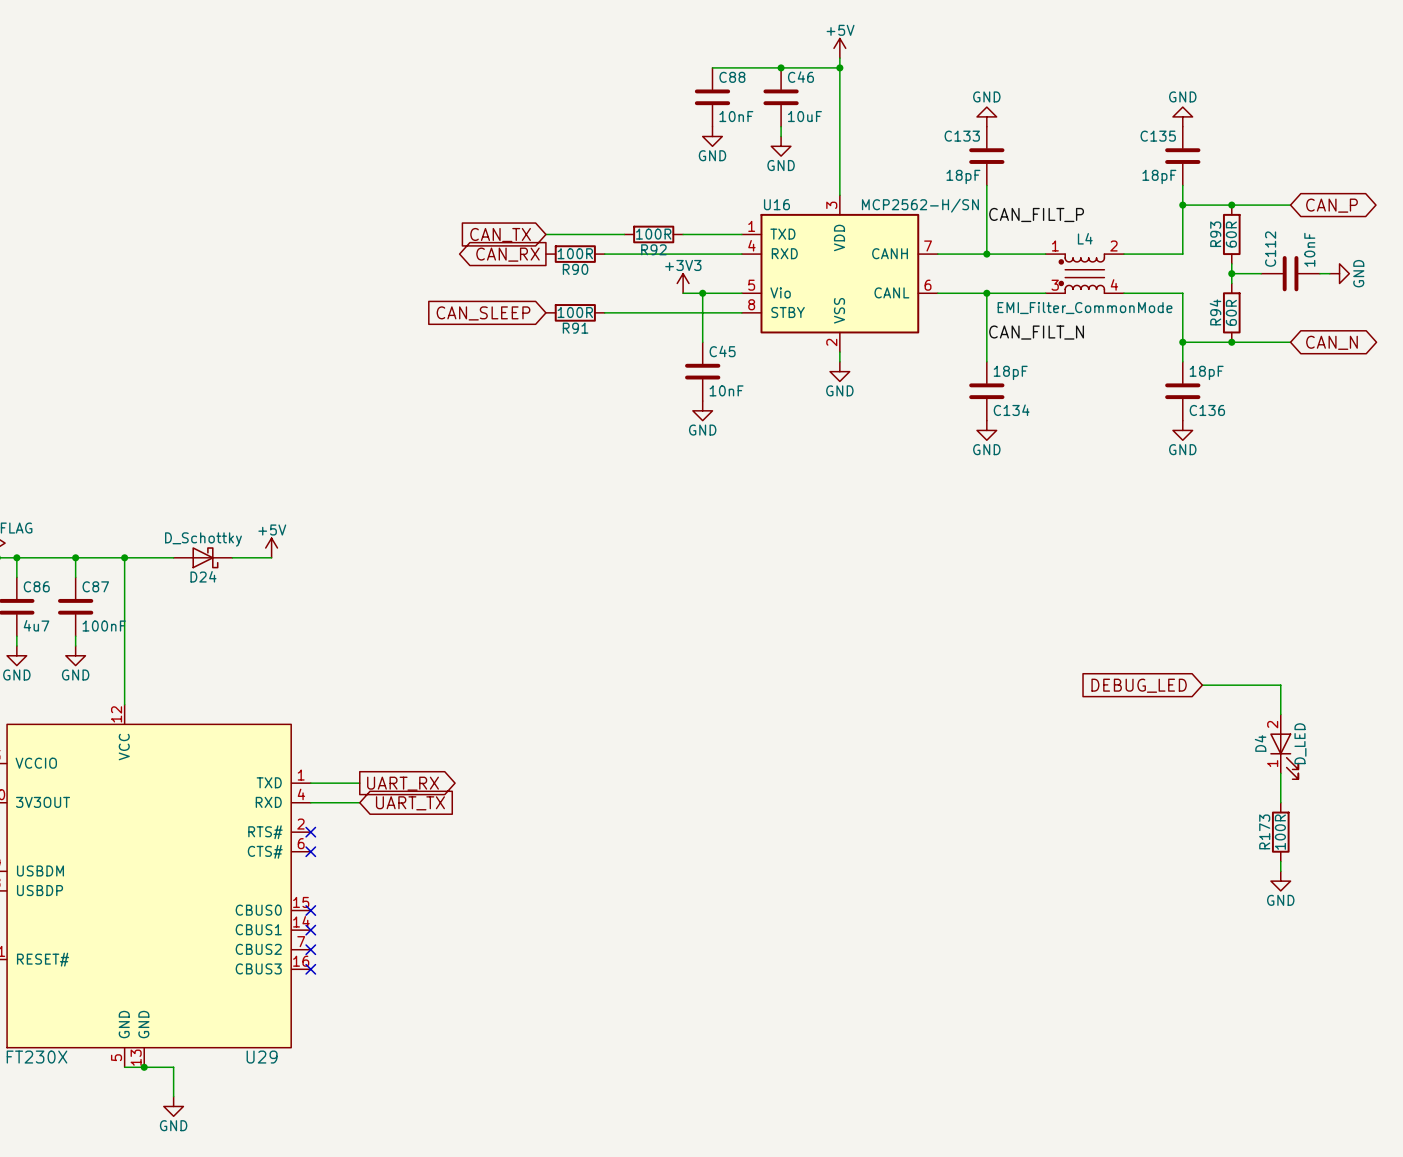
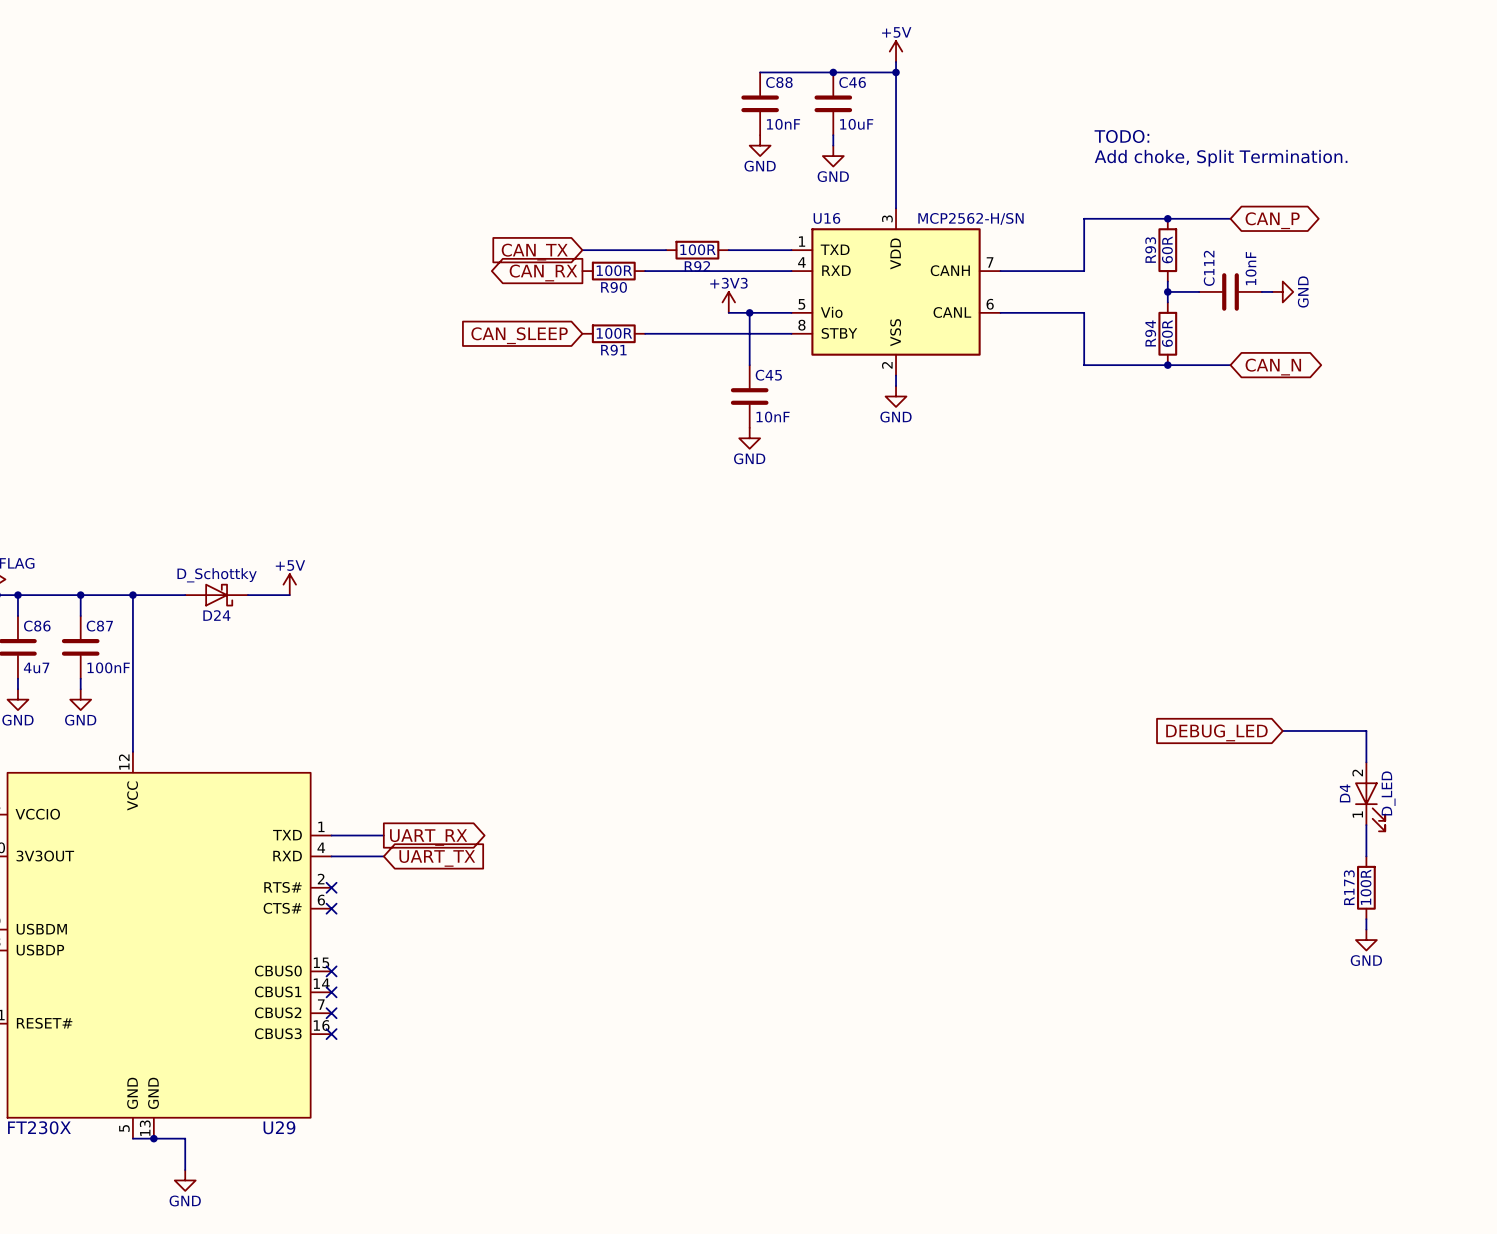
power symbol: GND (986, 116) -> none
power symbol: GND (1182, 116) -> none
text: none -> TODO: (1121, 136)
text: none -> Add choke, Split Termination. (1221, 158)
C133: 18pF (986, 156) -> none
C135: 18pF (1182, 156) -> none
wire: (986, 185) (986, 254) -> none
wire: (1182, 185) (1182, 254) (1123, 254) -> none
junction: none -> (1167, 218)
wire: (1182, 205) (1290, 205) -> none
junction: (1182, 205) -> none
junction: (1231, 205) -> none
global label position: CAN_P (1331, 205) -> CAN_P (1272, 220)
label: CAN_FILT_P (1036, 214) -> none
R93 position: (1231, 234) -> (1167, 250)
junction: (986, 254) -> none
wire: (1016, 254) (1045, 254) -> (1084, 271) (1084, 218) (1230, 218)
wire: (1231, 263) (1231, 283) -> (1167, 281) (1167, 302)
L4: EMI_Filter_CommonMode (1084, 273) -> none
junction: none -> (1167, 291)
power symbol: none -> GND (1282, 291)
wire: (1231, 273) (1261, 273) -> (1167, 291) (1199, 291)
junction: (1231, 273) -> none
C112 position: (1290, 273) -> (1230, 291)
wire: (1319, 273) (1329, 273) -> (1261, 291) (1272, 291)
power symbol: GND (1339, 273) -> none
wire: (986, 293) (986, 361) -> none
junction: (986, 293) -> none
wire: (1016, 293) (1045, 293) -> (1084, 312) (1084, 365) (1230, 365)
wire: (1123, 293) (1182, 293) (1182, 361) -> none
R94 position: (1231, 312) -> (1167, 333)
label: CAN_FILT_N (1036, 332) -> none
junction: none -> (1167, 365)
wire: (1182, 342) (1290, 342) -> none
junction: (1182, 342) -> none
junction: (1231, 342) -> none
global label position: CAN_N (1331, 342) -> CAN_N (1273, 367)
C134: 18pF (986, 391) -> none
C136: 18pF (1182, 391) -> none
power symbol: GND (986, 430) -> none
power symbol: GND (1182, 430) -> none

